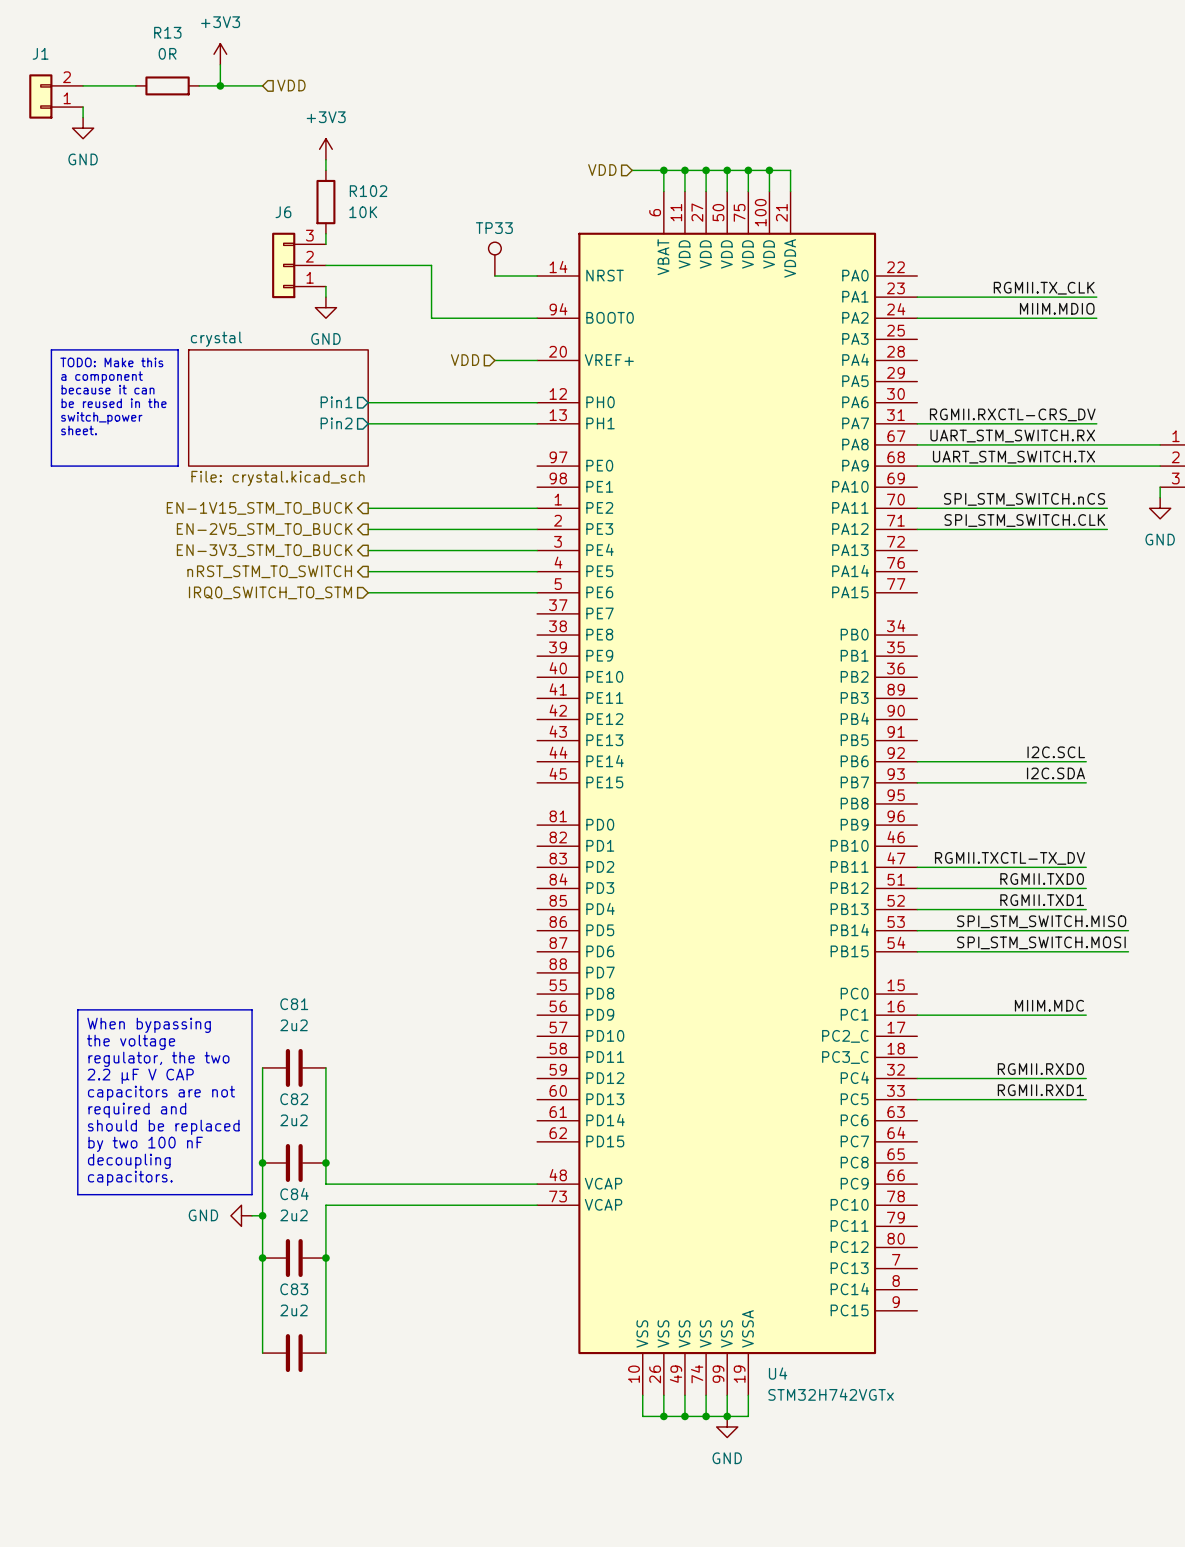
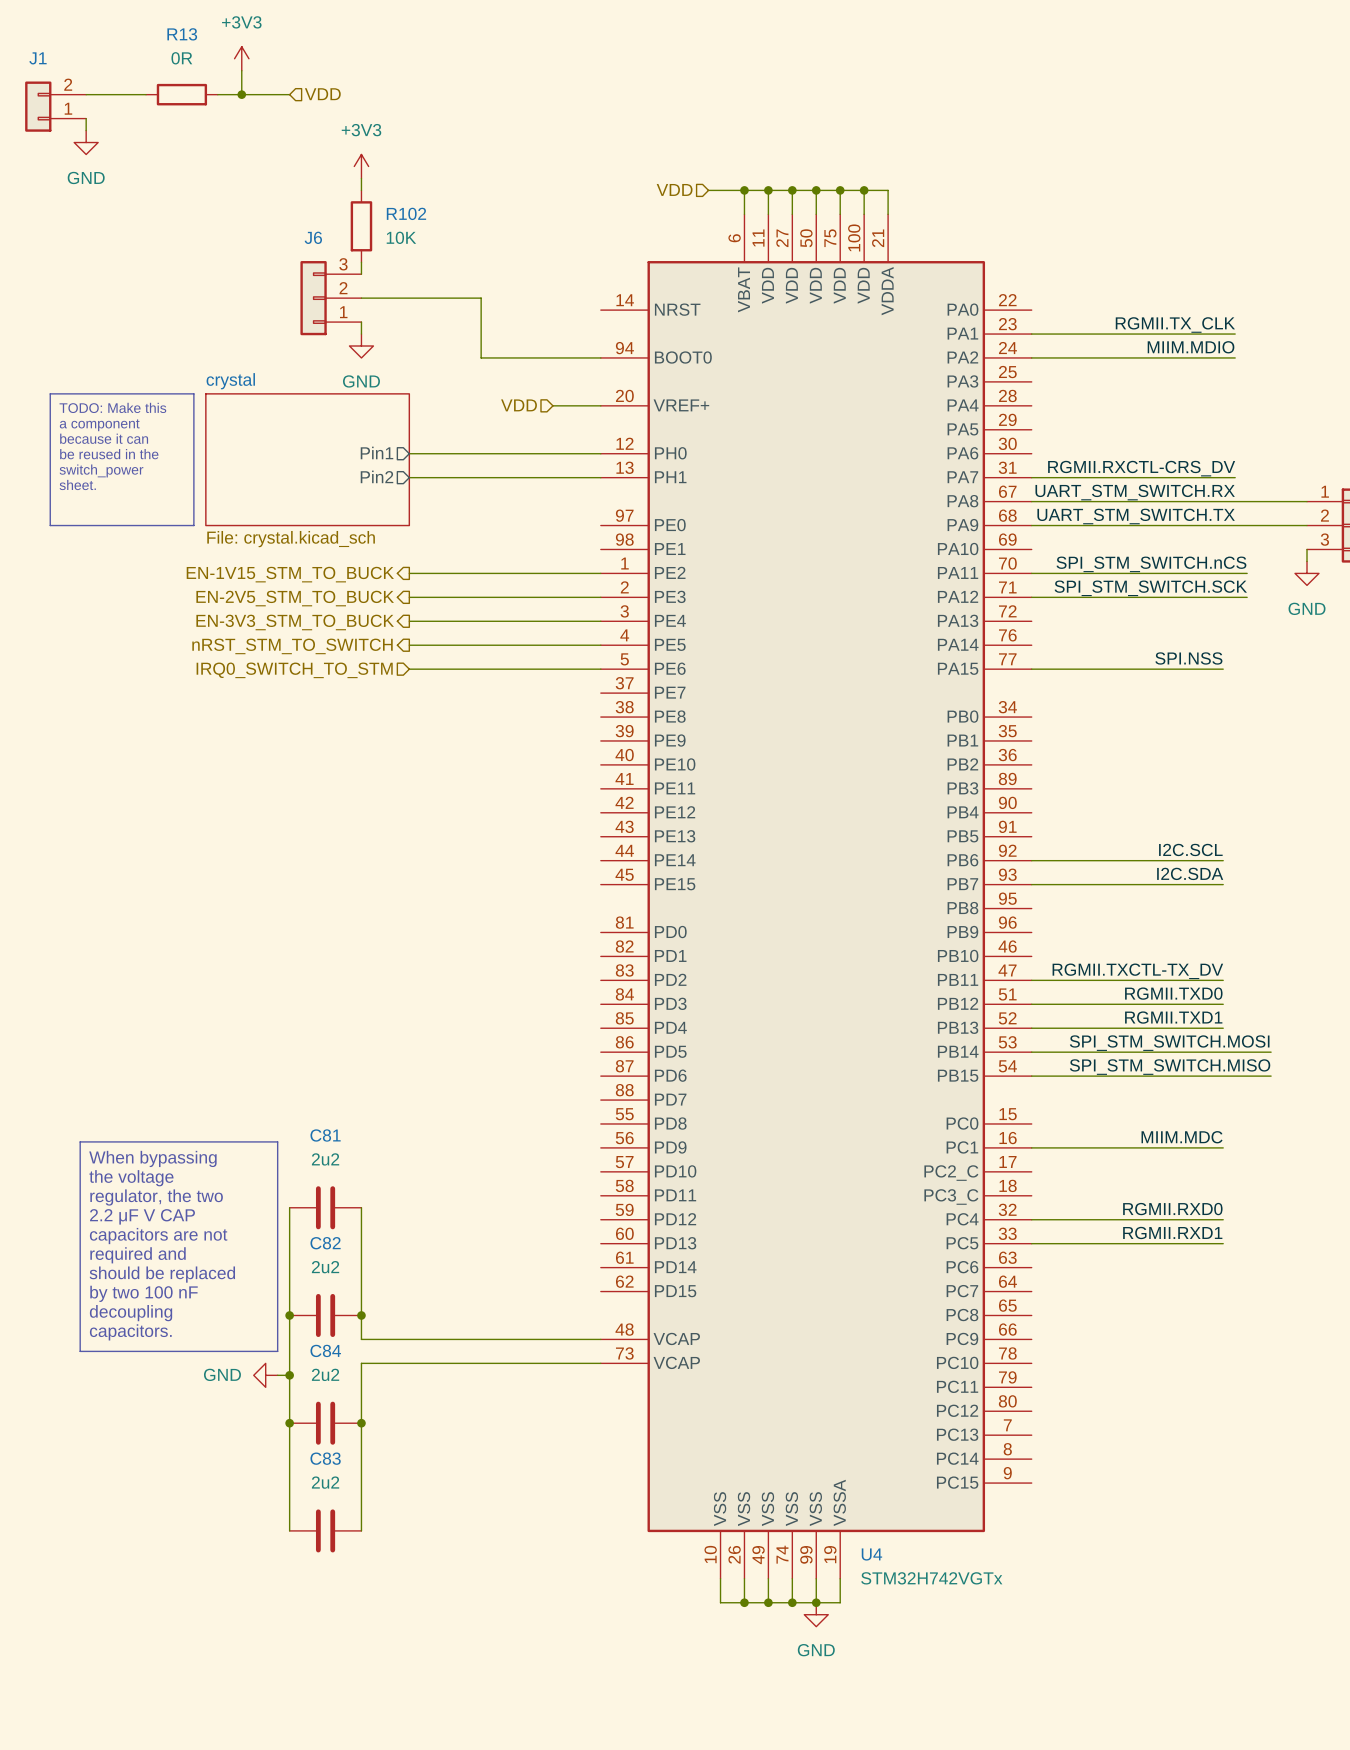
TP33: (494, 259) -> none
wire: (494, 275) (537, 275) -> none
label: SPI_STM_SWITCH.CLK (1024, 520) -> SPI_STM_SWITCH.SCK (1150, 588)
label: none -> SPI.NSS (1188, 658)
wire: none -> (1031, 669) (1223, 669)
label: SPI_STM_SWITCH.MISO (1041, 921) -> SPI_STM_SWITCH.MOSI (1169, 1043)
label: SPI_STM_SWITCH.MOSI (1041, 942) -> SPI_STM_SWITCH.MISO (1170, 1067)

